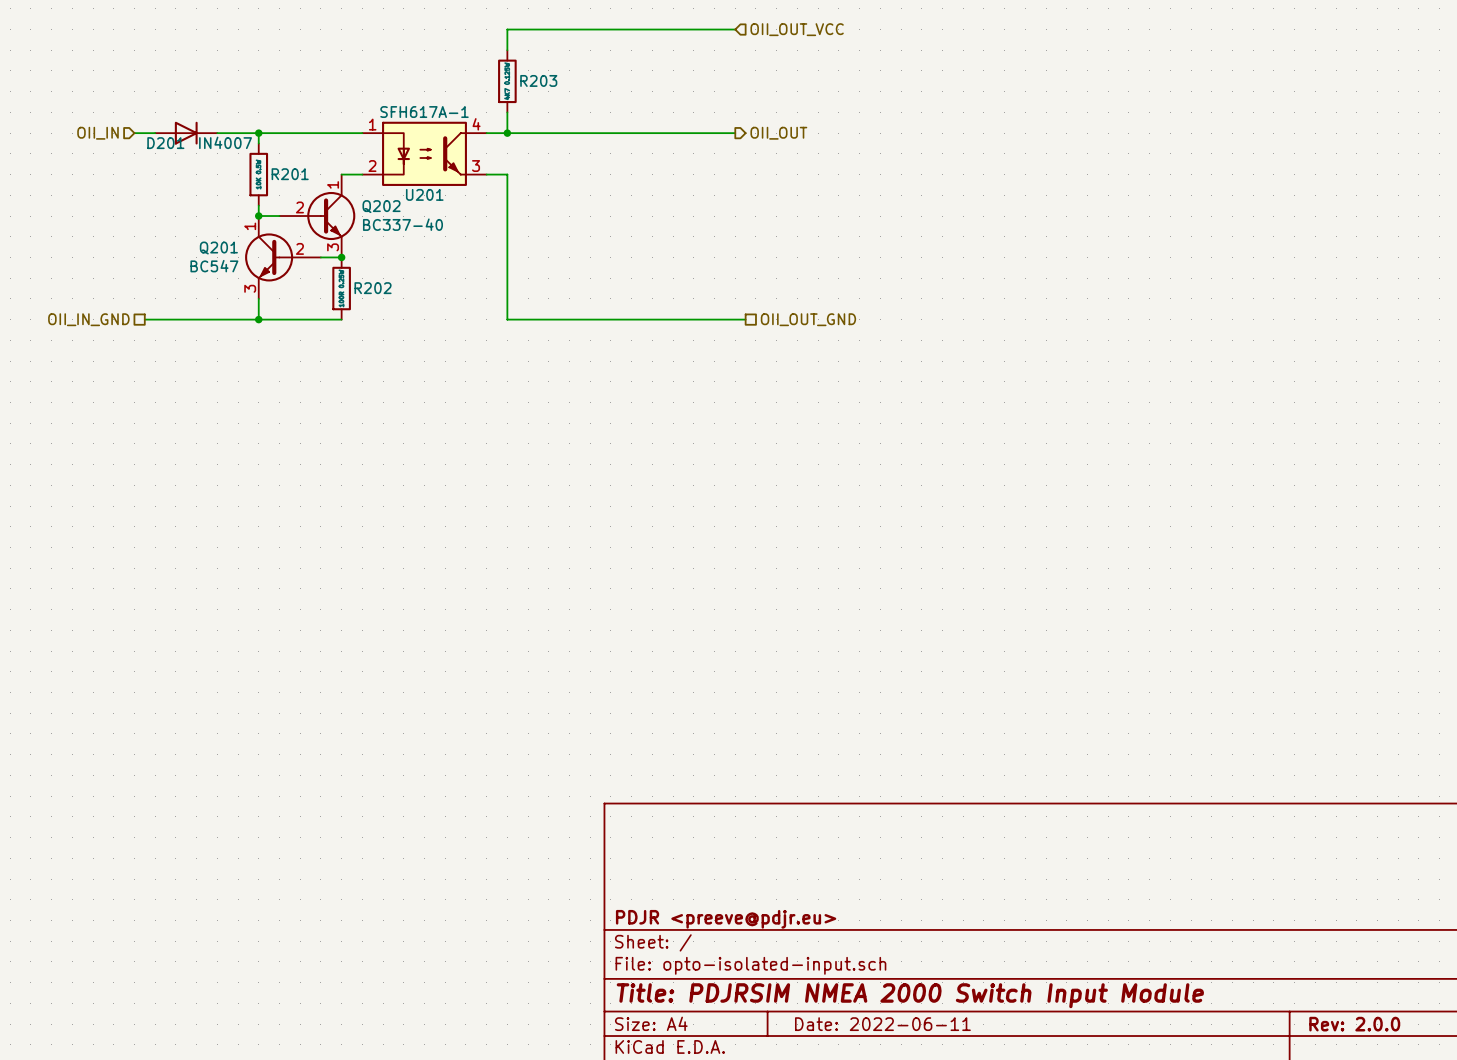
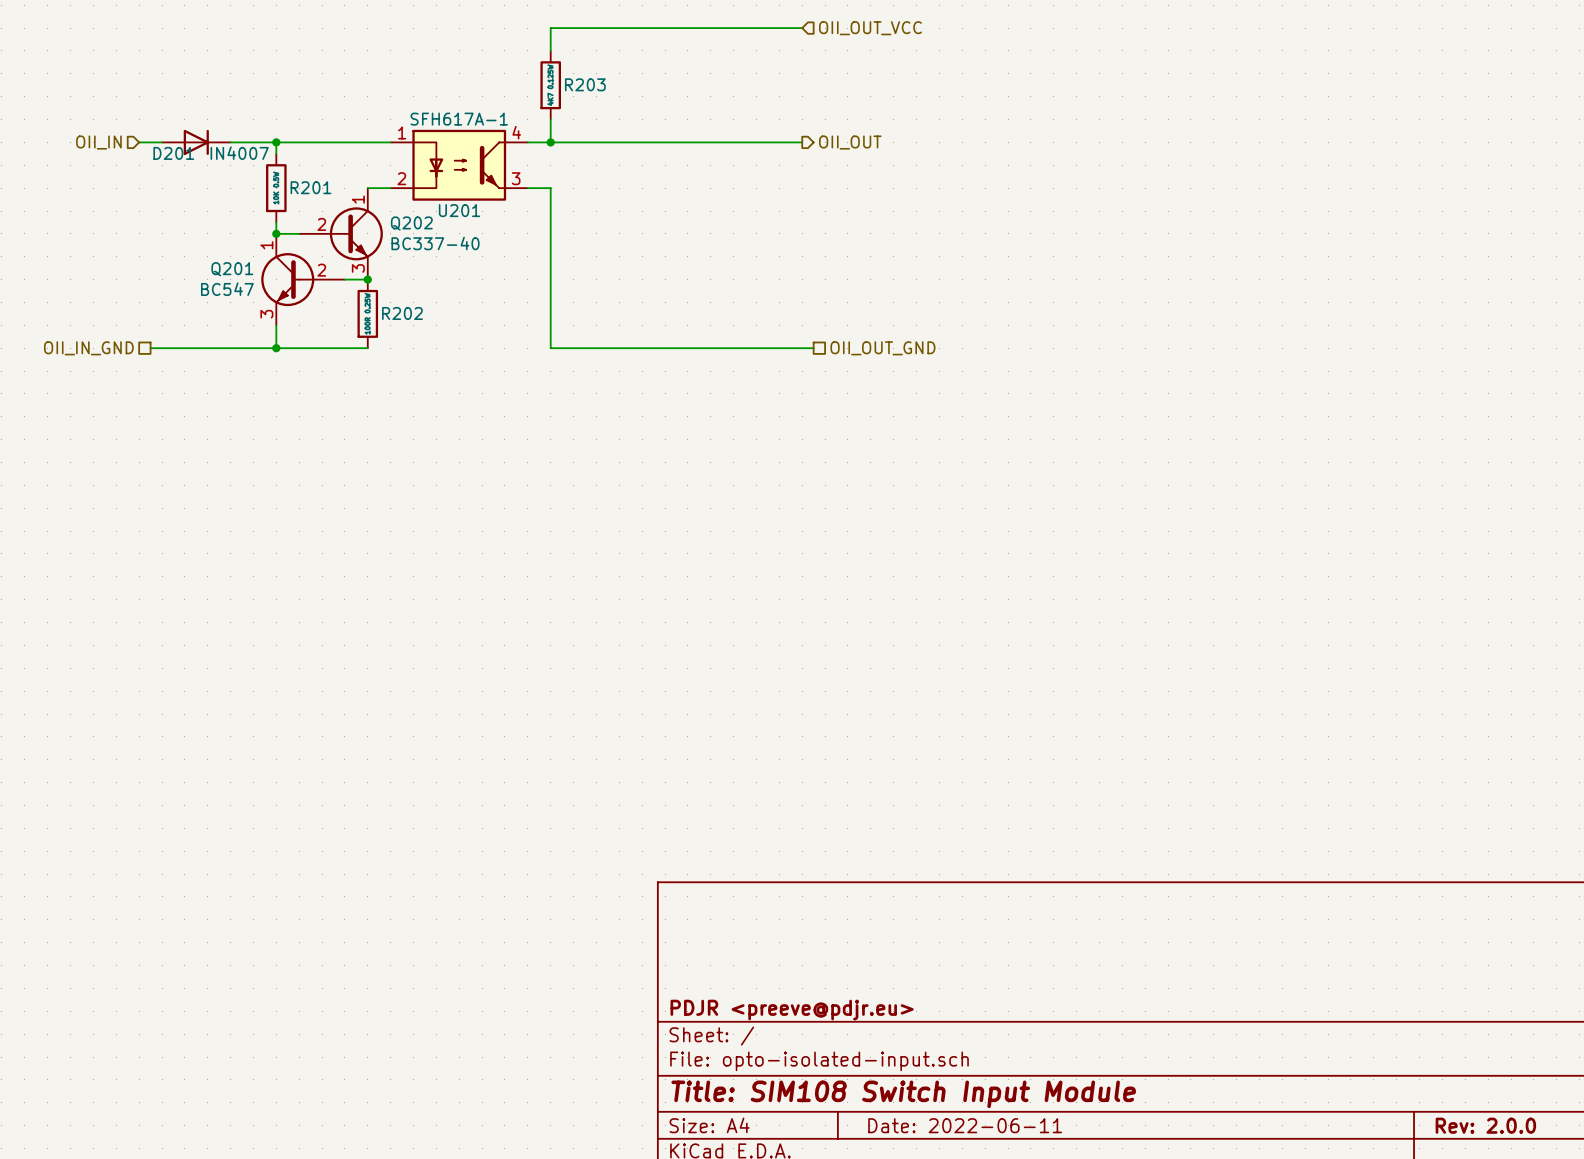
title block: Title: PDJRSIM NMEA 2000 Switch Input Module (910, 995) -> Title: SIM108 Switch Input Module (903, 1094)

